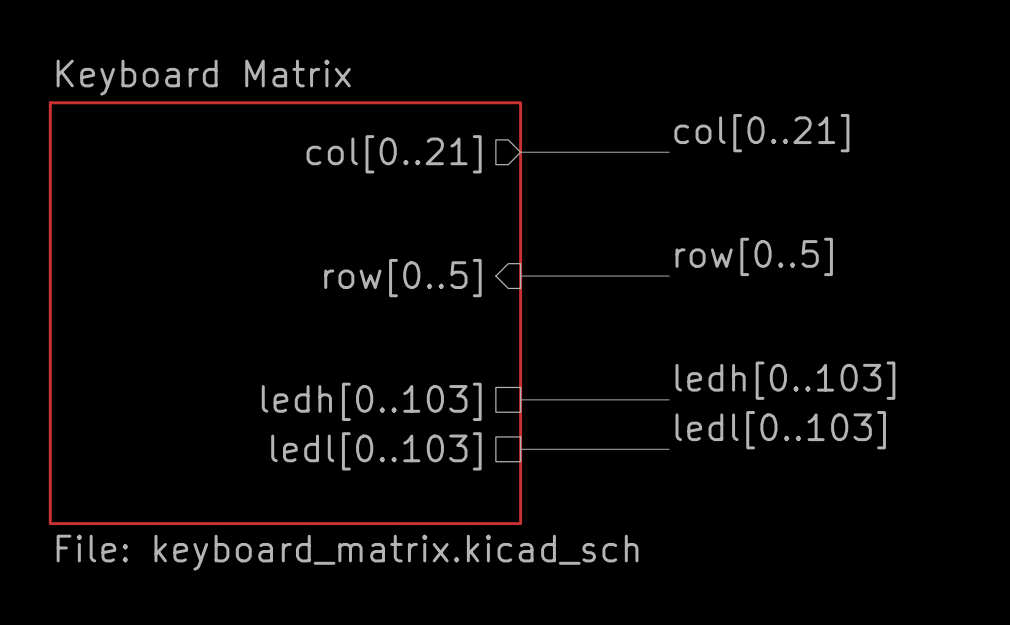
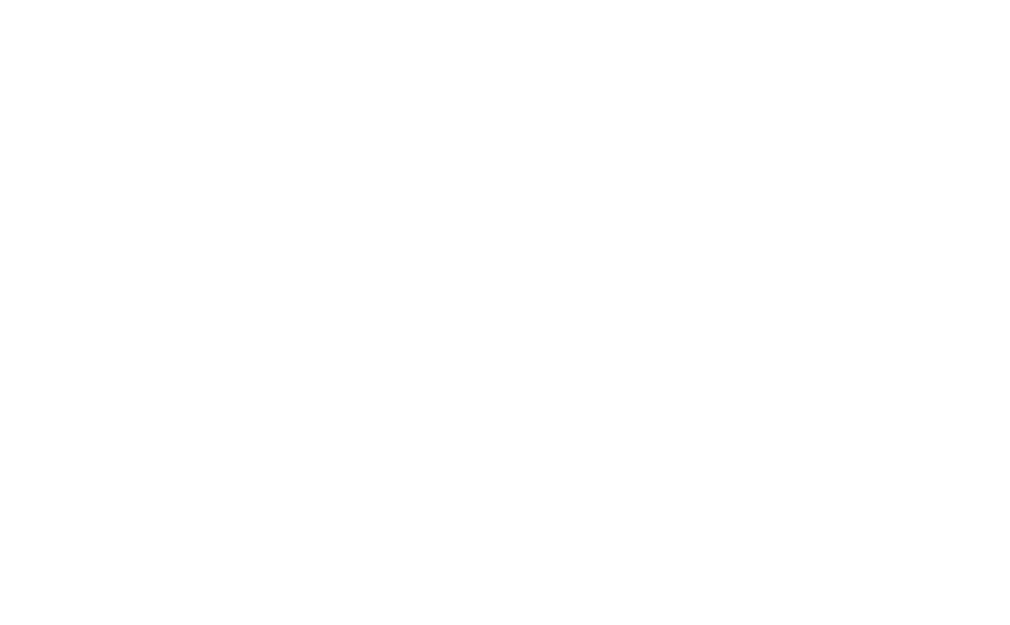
label: col[0..21] (761, 133) -> none
bus: (520, 152) (669, 152) -> none
sheet pin: col[0..21] (394, 154) -> none
label: row[0..5] (754, 256) -> none
bus: (520, 276) (669, 276) -> none
sheet pin: row[0..5] (402, 278) -> none
sheet Keyboard Matrix: File: keyboard_matrix.kicad_sch (285, 313) -> none
label: ledh[0..103] (785, 380) -> none
bus: (520, 399) (669, 399) -> none
sheet pin: ledh[0..103] (371, 401) -> none
label: ledl[0..103] (780, 430) -> none
bus: (520, 449) (669, 449) -> none
sheet pin: ledl[0..103] (376, 451) -> none

